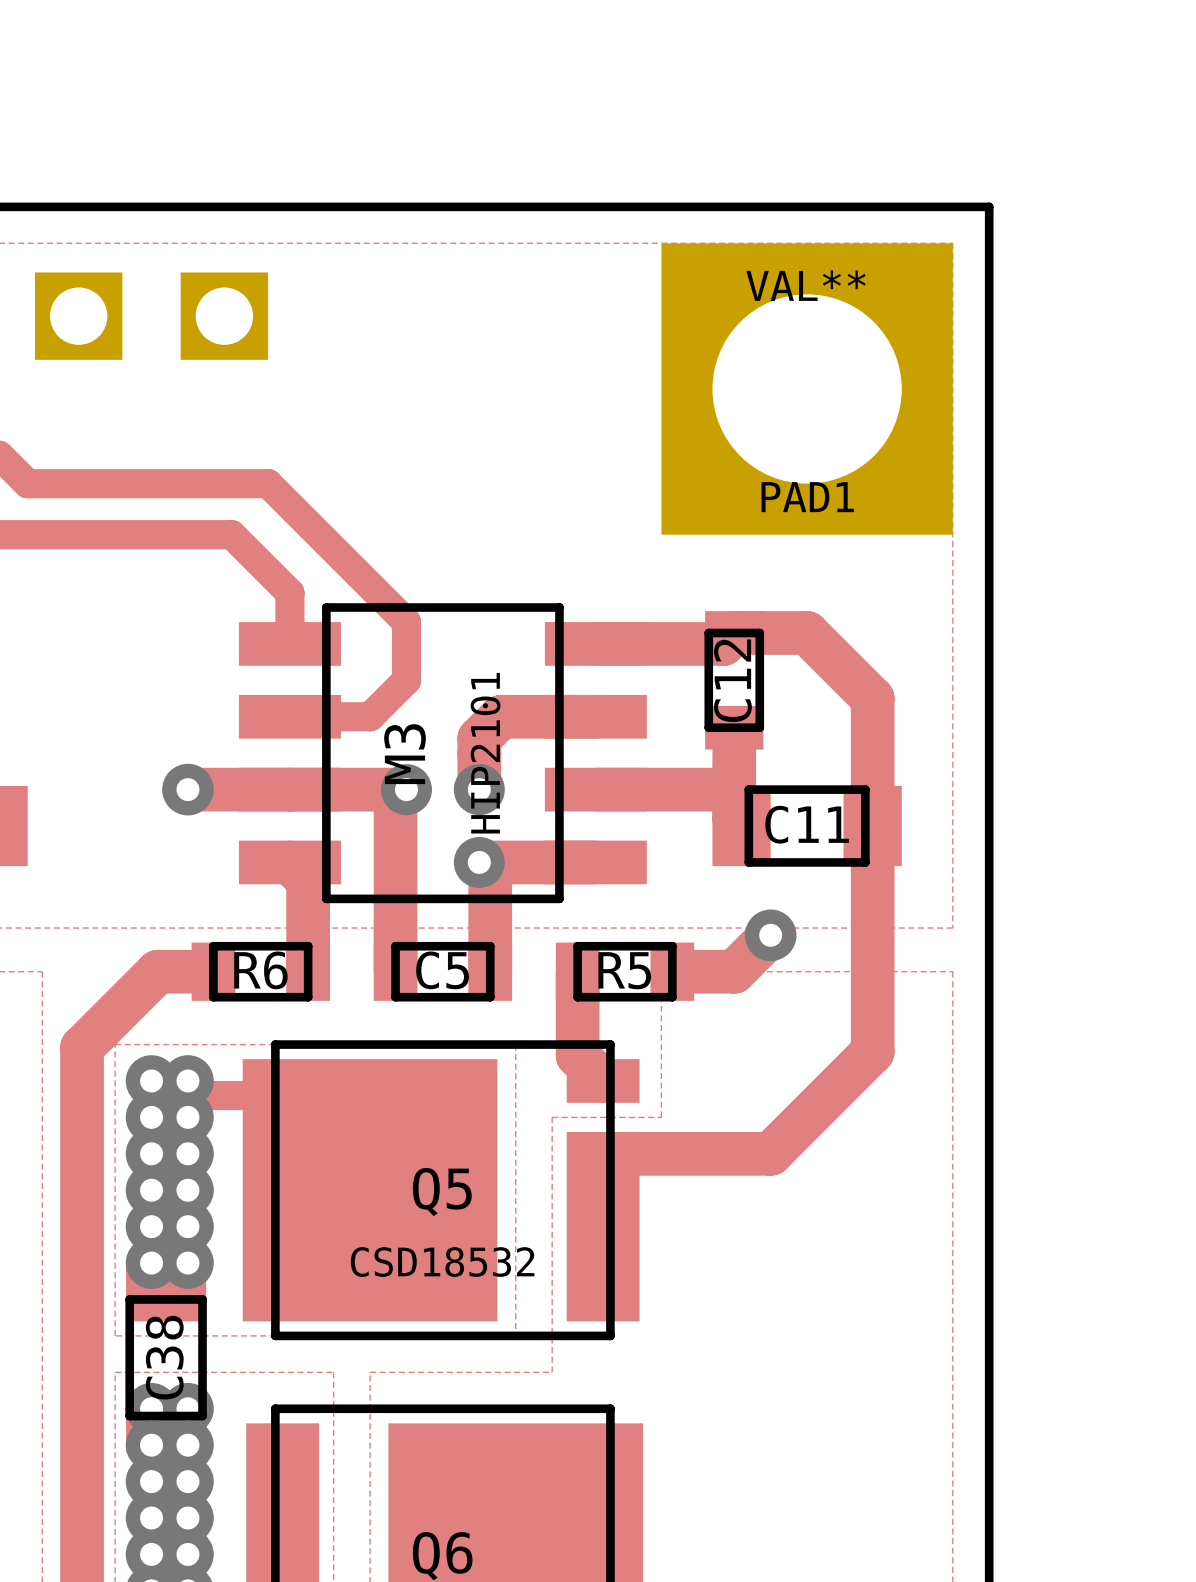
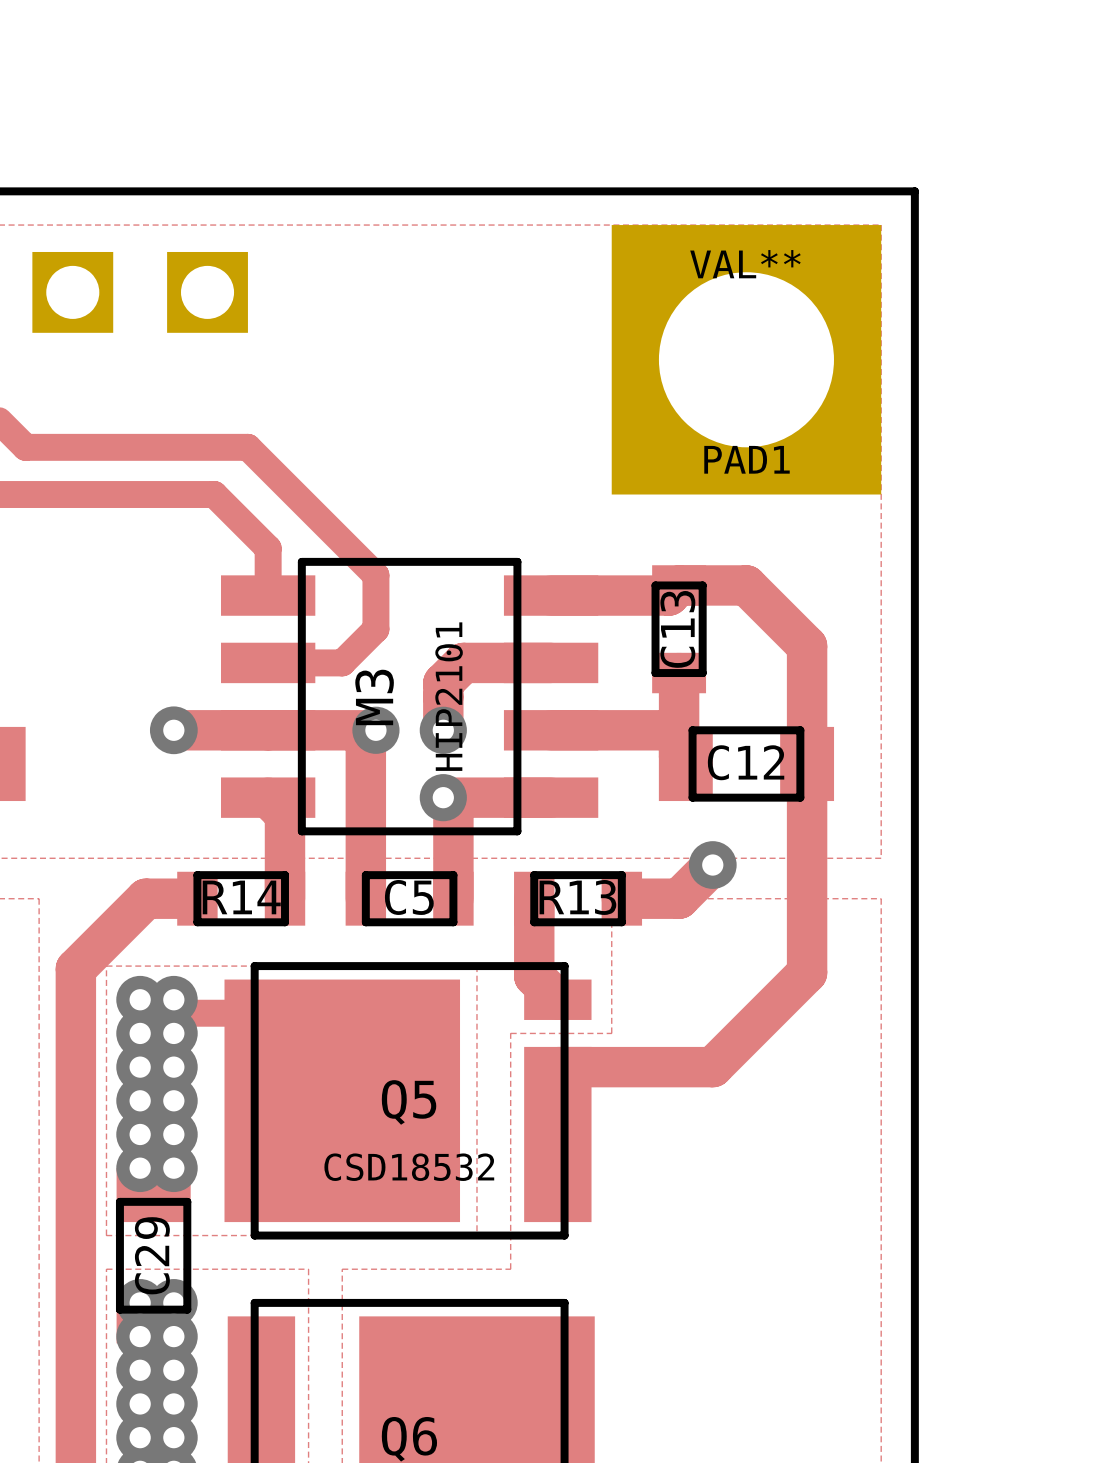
C12 name: C12 (732, 680) -> C13 (677, 629)
C11 name: C11 (807, 824) -> C12 (746, 762)
R6 name: R6 (260, 970) -> R14 (241, 897)
R5 name: R5 (624, 970) -> R13 (577, 897)
C38 name: C38 (164, 1357) -> C29 (152, 1255)

